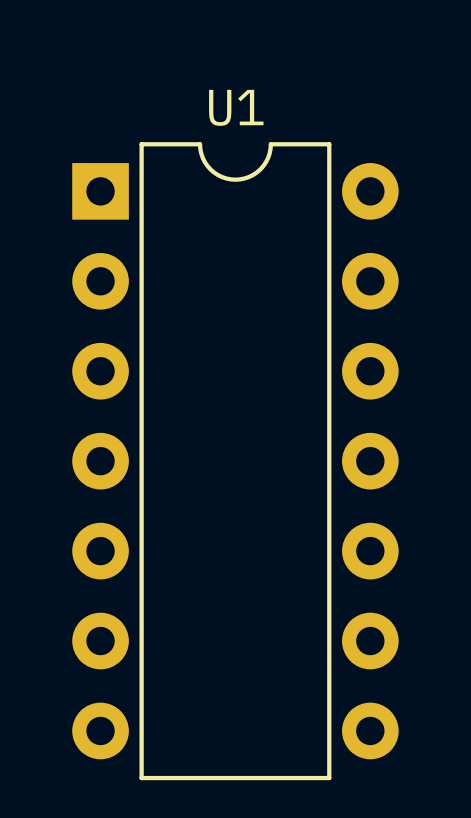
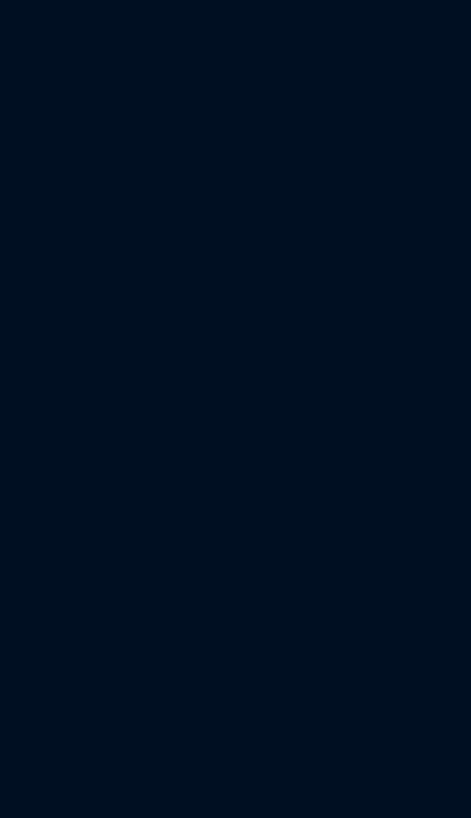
U1: (235, 461) -> none

